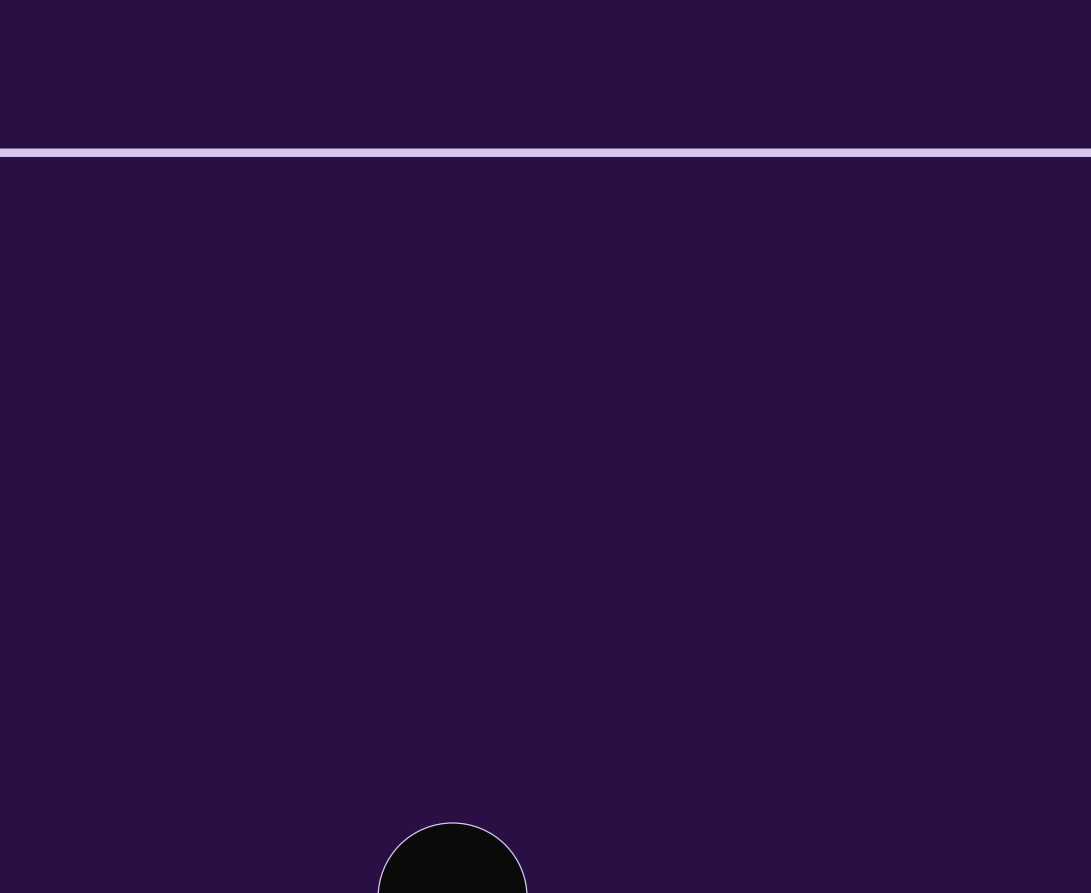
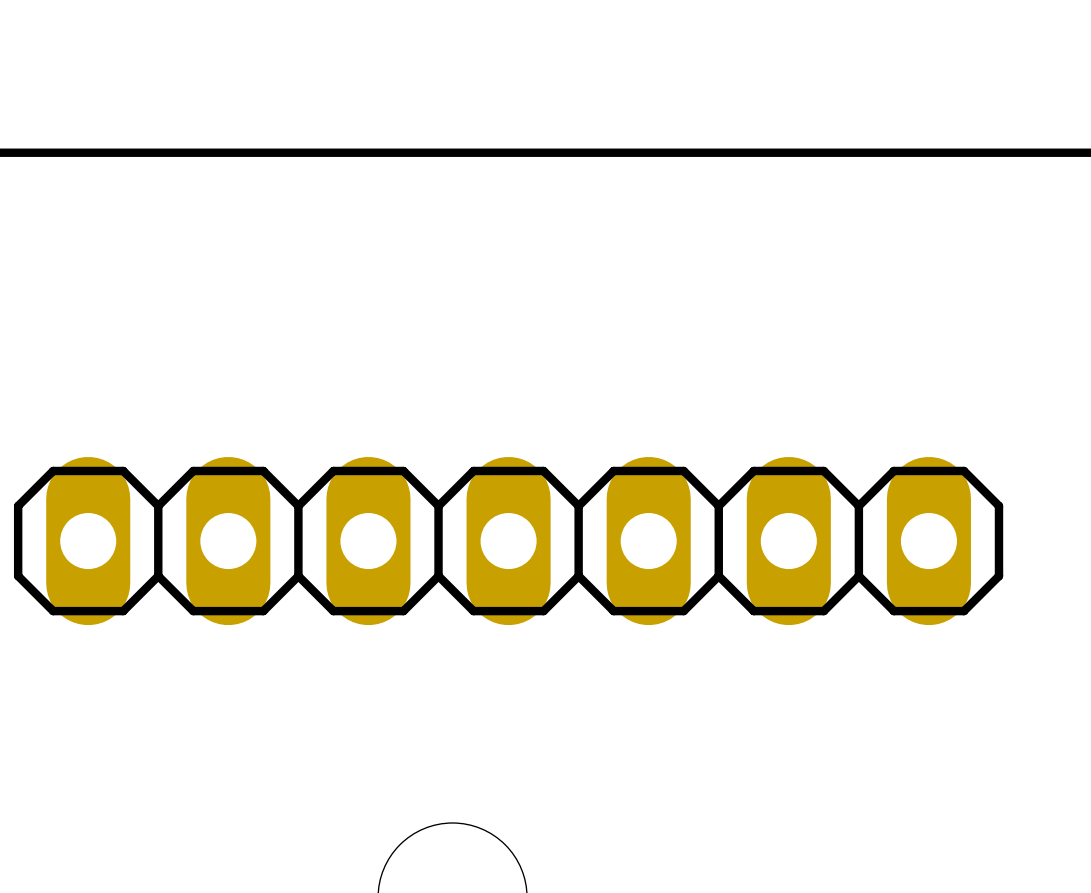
part: none -> (508, 541)

